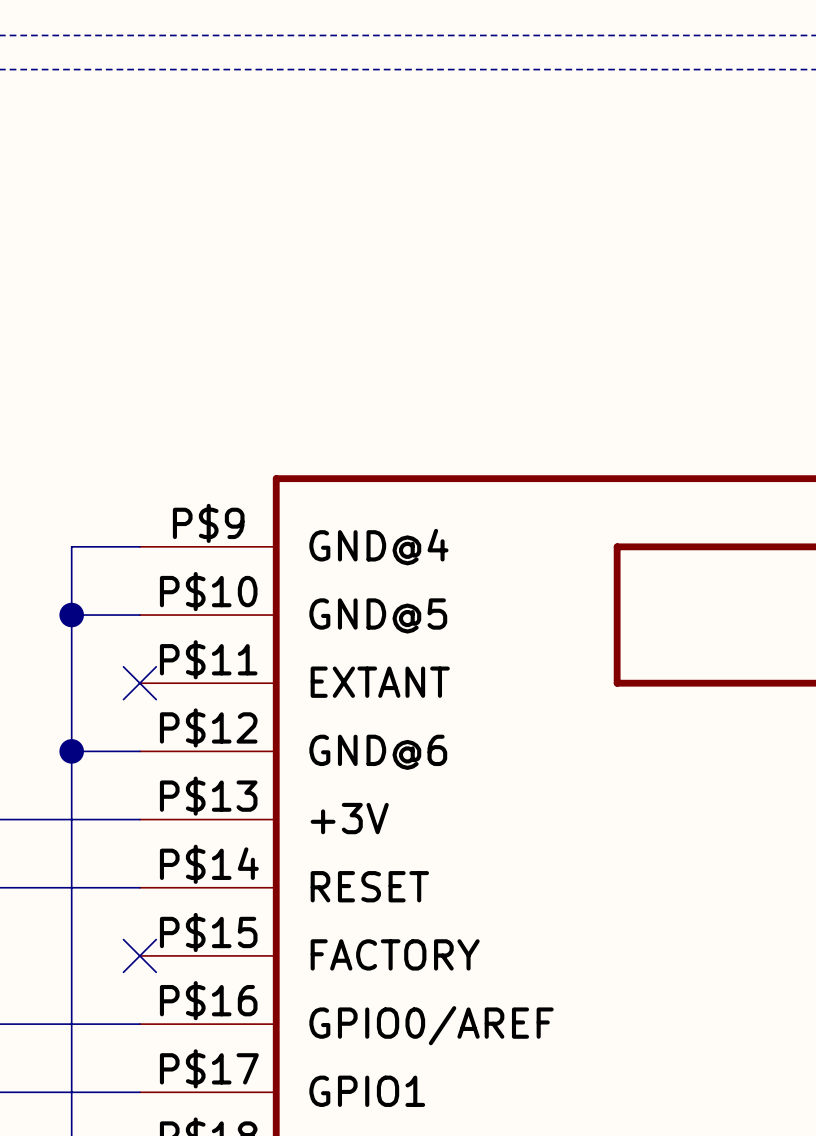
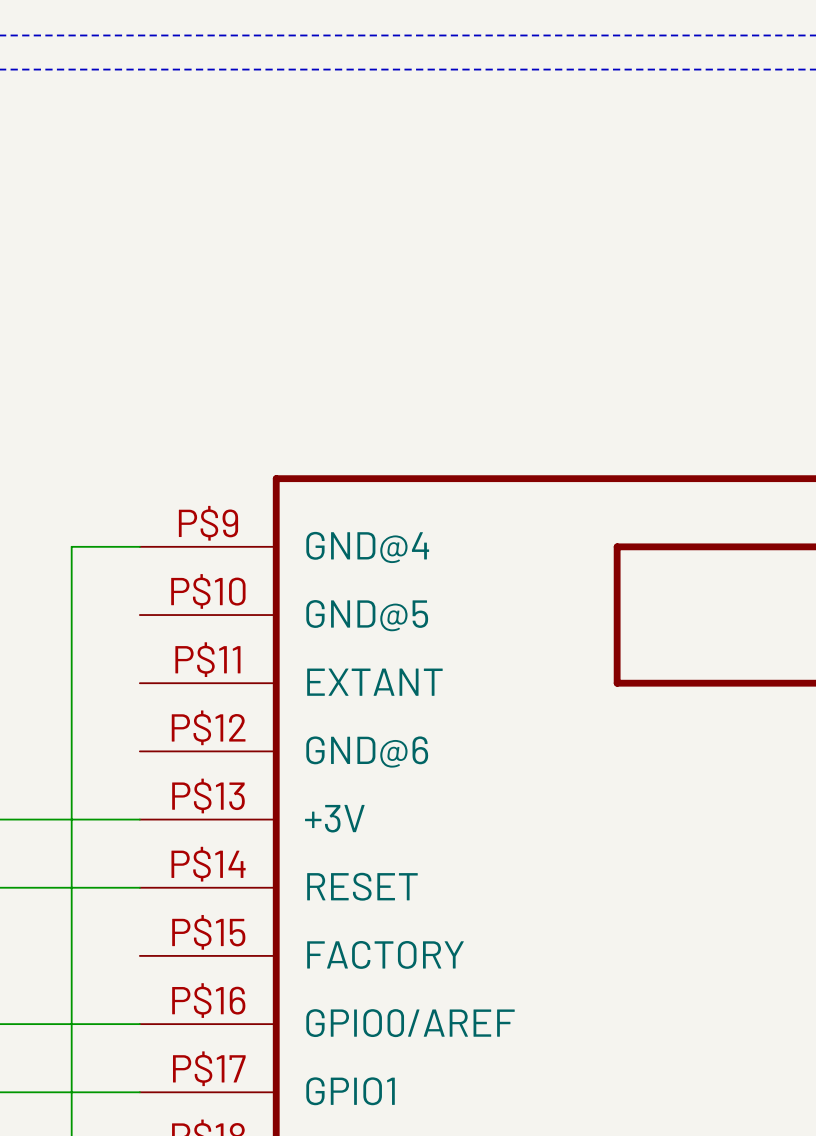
wire: (71, 615) (139, 615) -> none
junction: (71, 615) -> none
no-connect mark: (139, 683) -> none
wire: (71, 751) (139, 751) -> none
junction: (71, 751) -> none
no-connect mark: (139, 955) -> none

